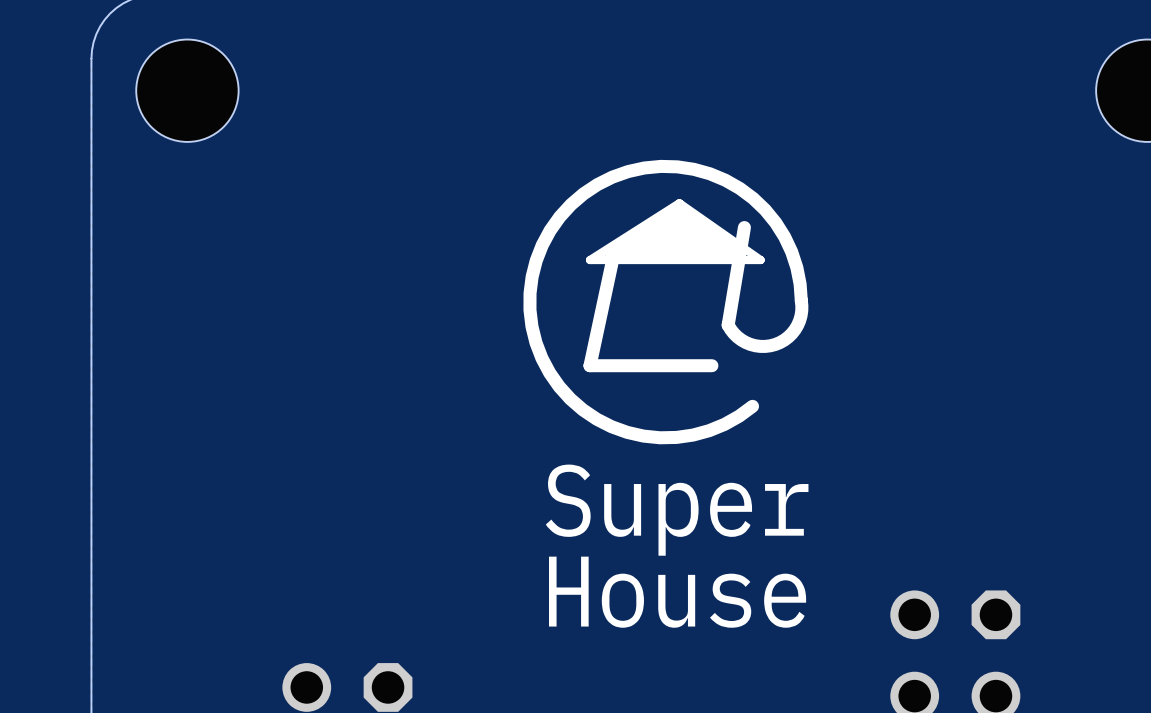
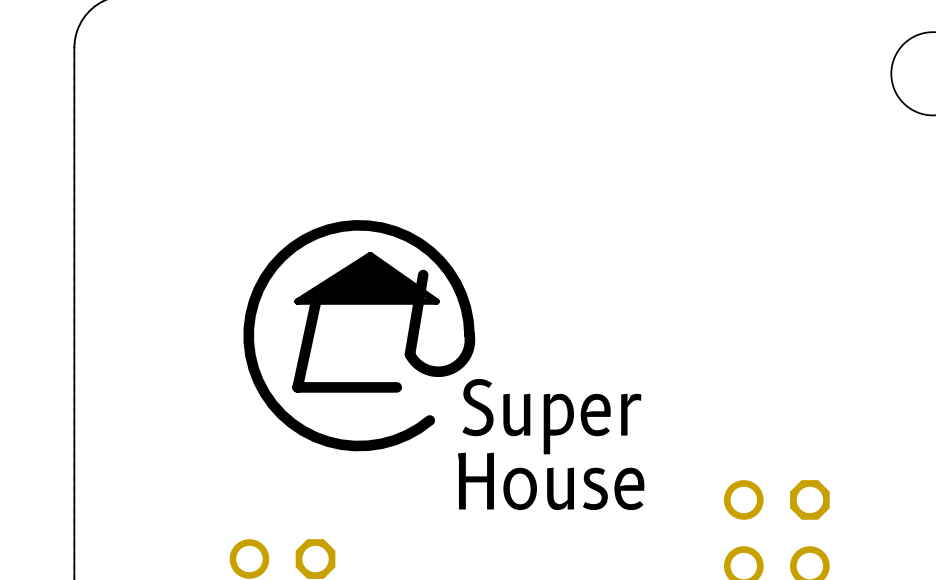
hole: (187, 90) -> none
line: (679, 203) (590, 260) (760, 260) (679, 203) -> (370, 255) (297, 301) (436, 301) (370, 255)
line: (679, 227) (663, 235) (703, 235) (679, 219) (630, 243) (720, 243) -> (370, 275) (357, 281) (390, 281) (370, 268) (330, 288) (403, 288)
line: (744, 227) (728, 325) (737, 336) (750, 344) (760, 346) (775, 344) (791, 333) (797, 325) (801, 310) (796, 267) (784, 236) (765, 209) (739, 188) (710, 173) (677, 166) (660, 166) (628, 171) (597, 184) (570, 204) (559, 216) (542, 245) (532, 276) (529, 310) (535, 342) (541, 358) (559, 386) (582, 409) (611, 426) (627, 432) (660, 437) (693, 435) (724, 424) (752, 406) -> (423, 275) (409, 354) (417, 364) (428, 370) (436, 371) (448, 370) (461, 361) (466, 354) (469, 342) (465, 307) (455, 282) (440, 260) (419, 243) (395, 231) (368, 225) (355, 225) (328, 229) (303, 240) (282, 256) (273, 266) (258, 289) (250, 315) (248, 342) (253, 368) (258, 381) (272, 404) (291, 423) (315, 437) (327, 441) (354, 446) (381, 443) (407, 435) (429, 420)
line: (606, 251) (736, 251) (679, 211) (614, 251) (590, 365) (711, 365) -> (310, 294) (416, 294) (370, 261) (317, 294) (297, 387) (396, 387)

